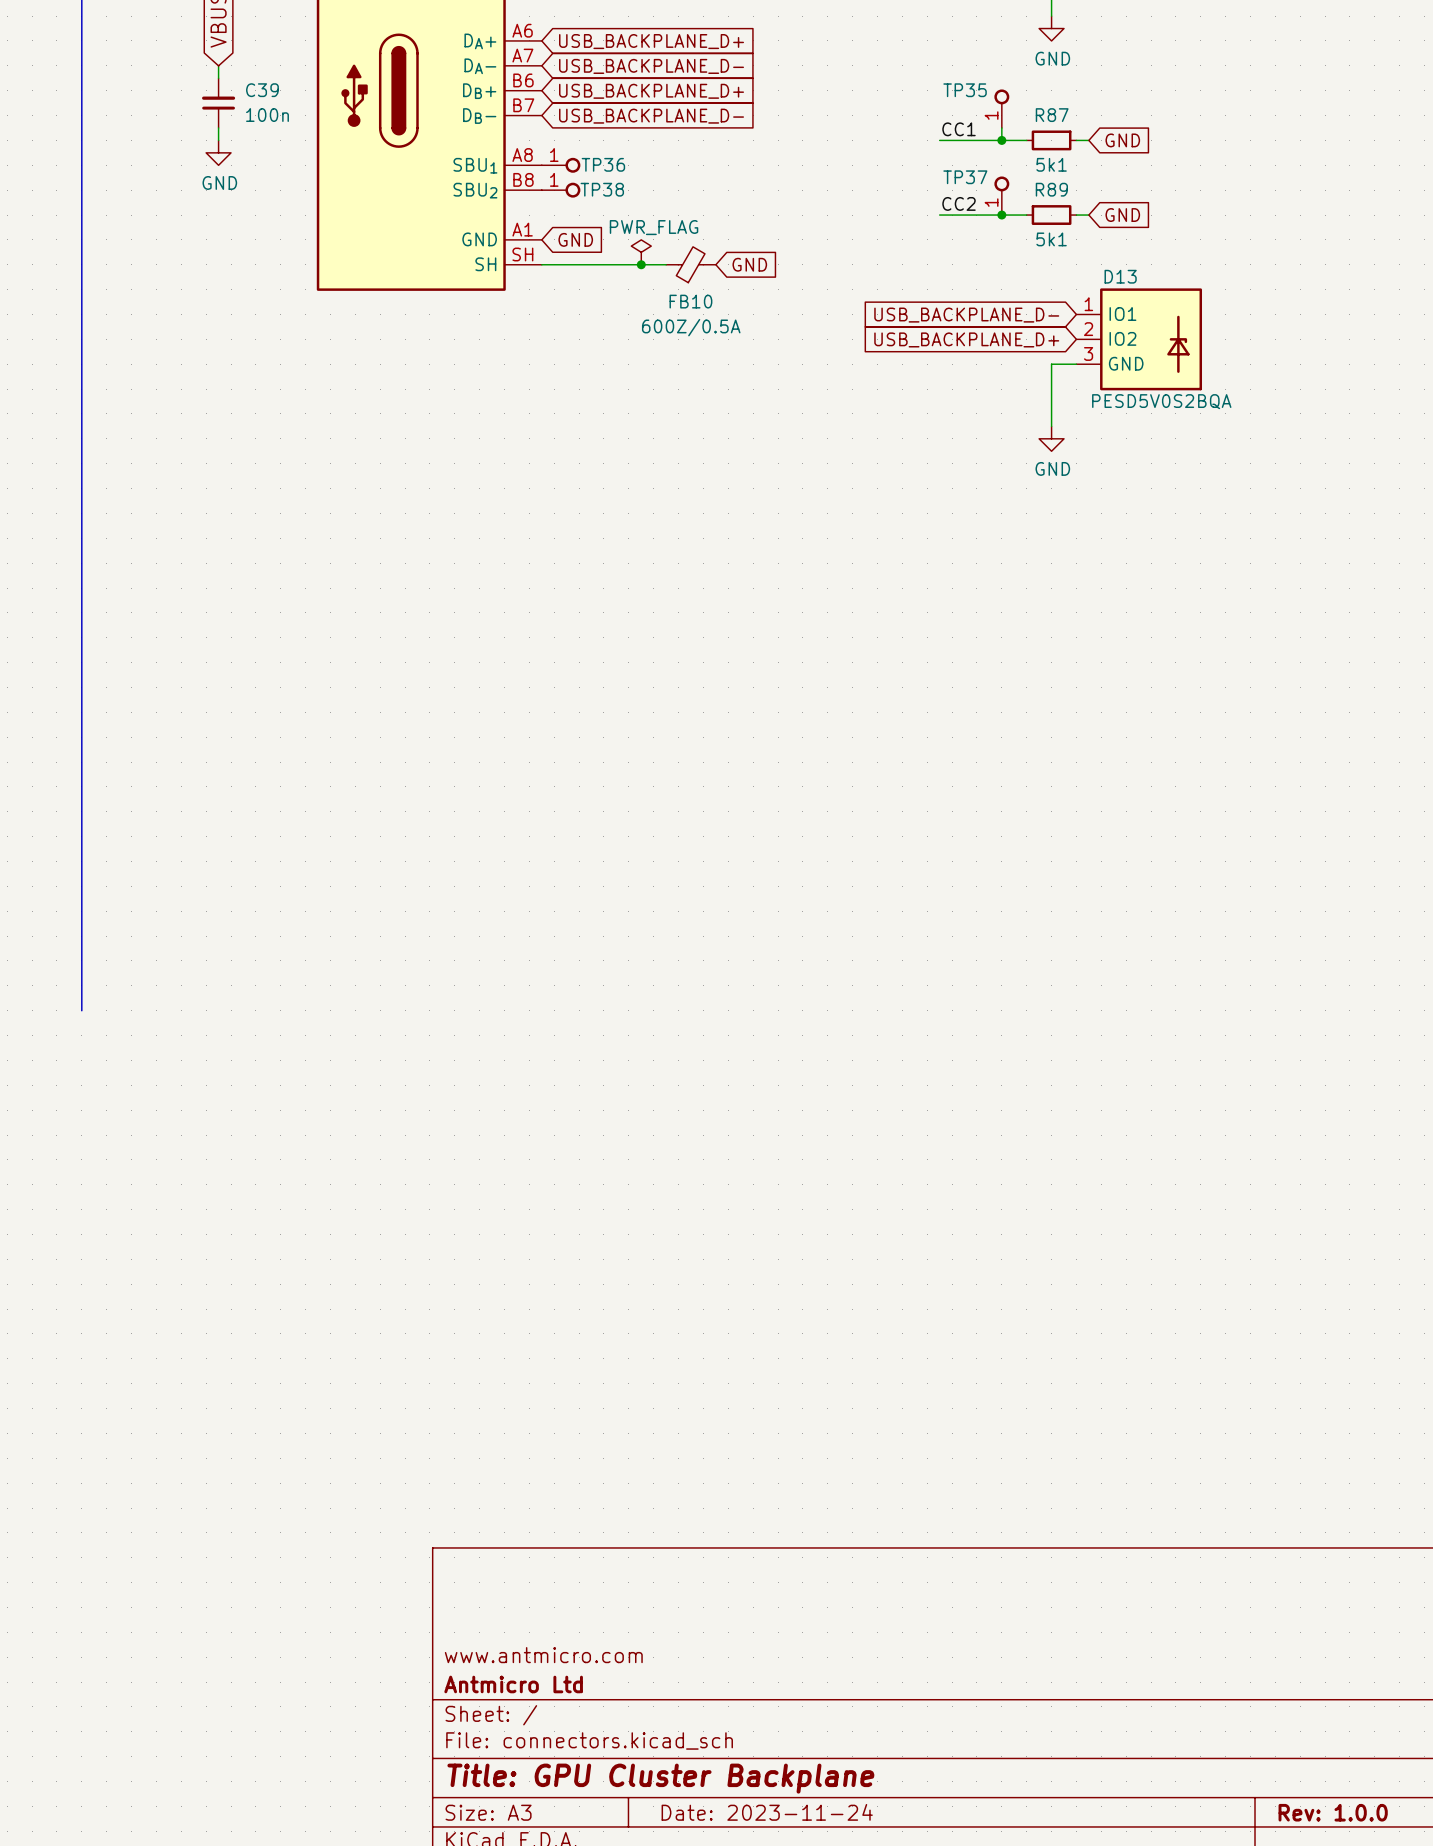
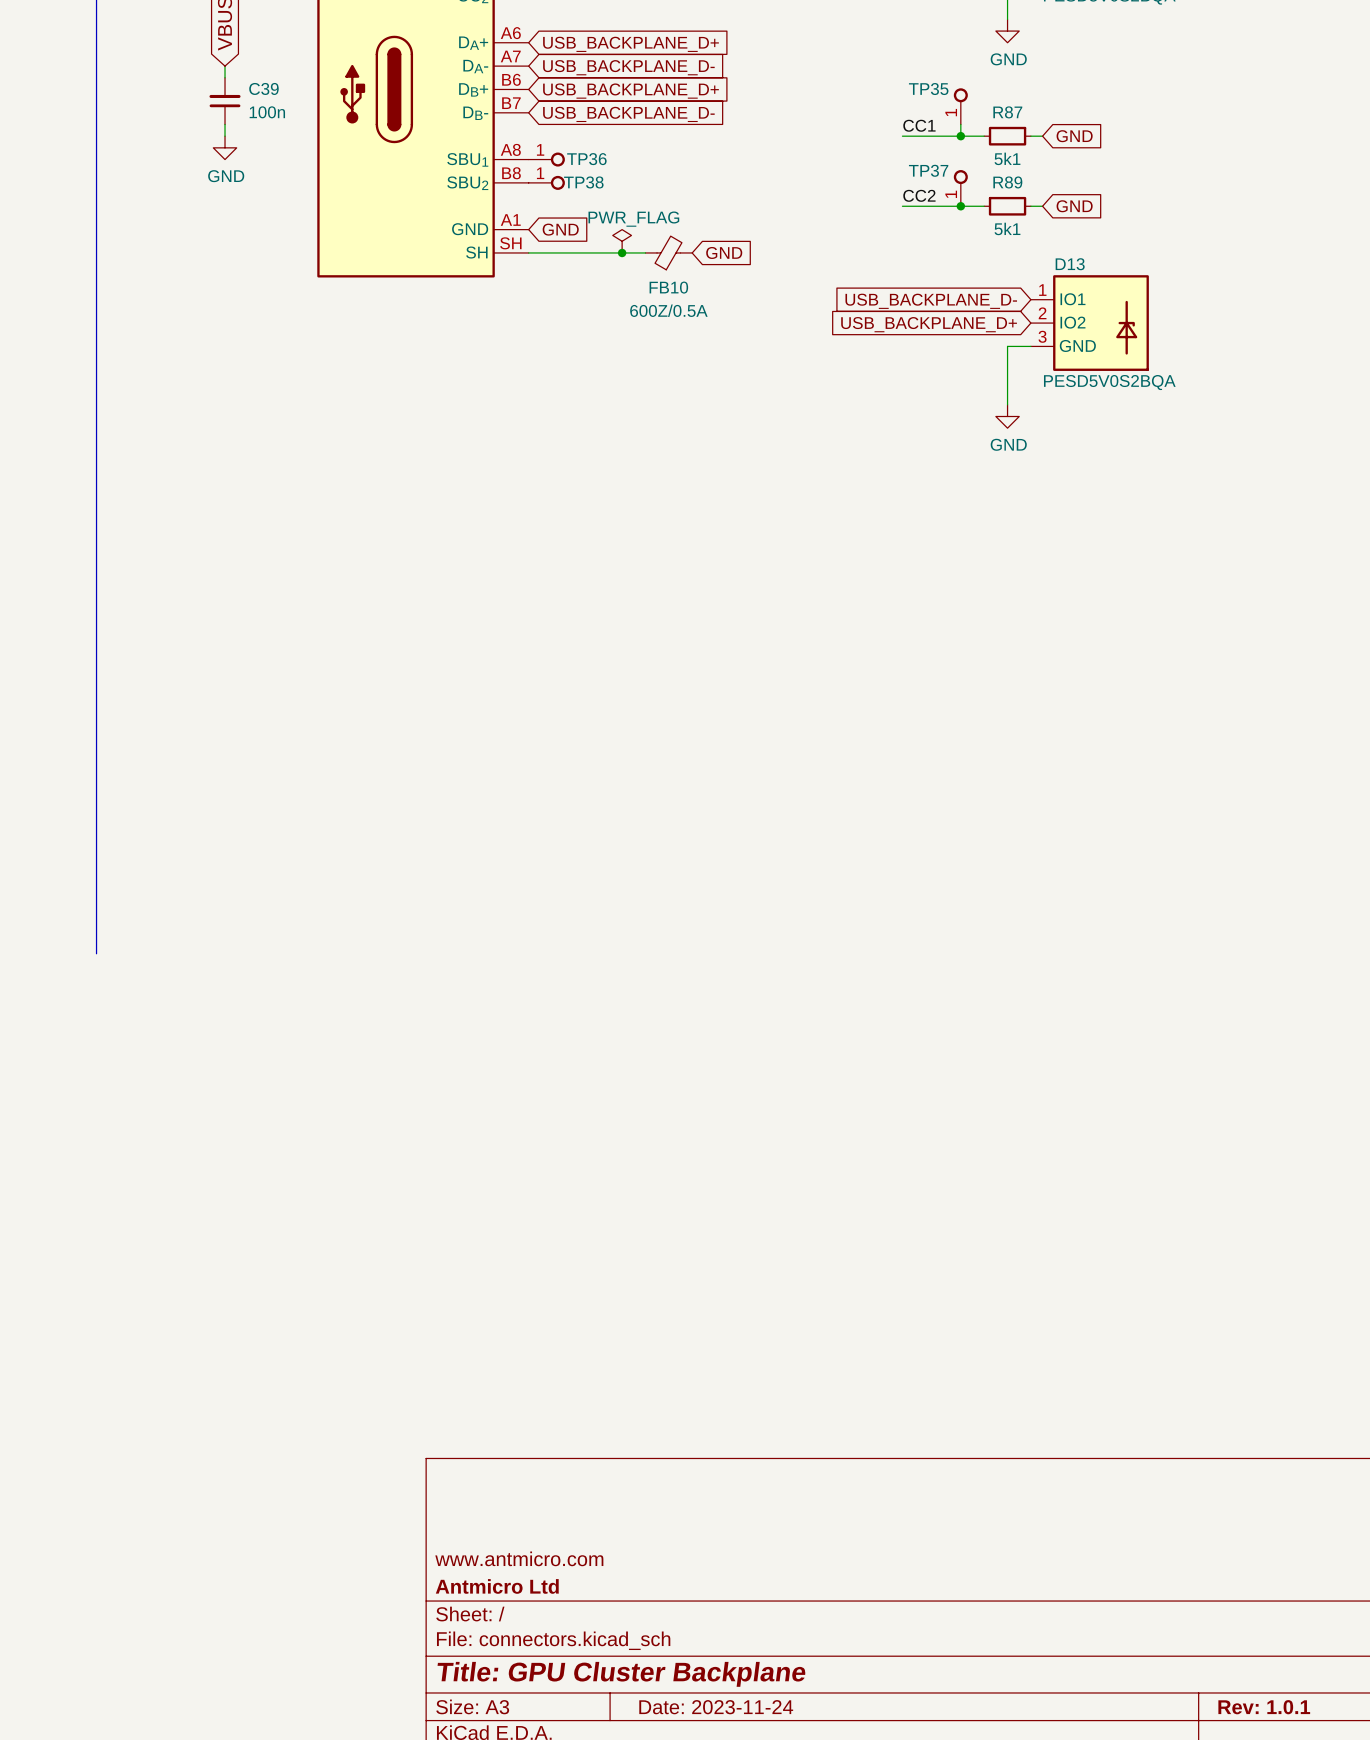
title block: Rev: 1.0.0 (1333, 1812) -> Rev: 1.0.1 (1264, 1707)

